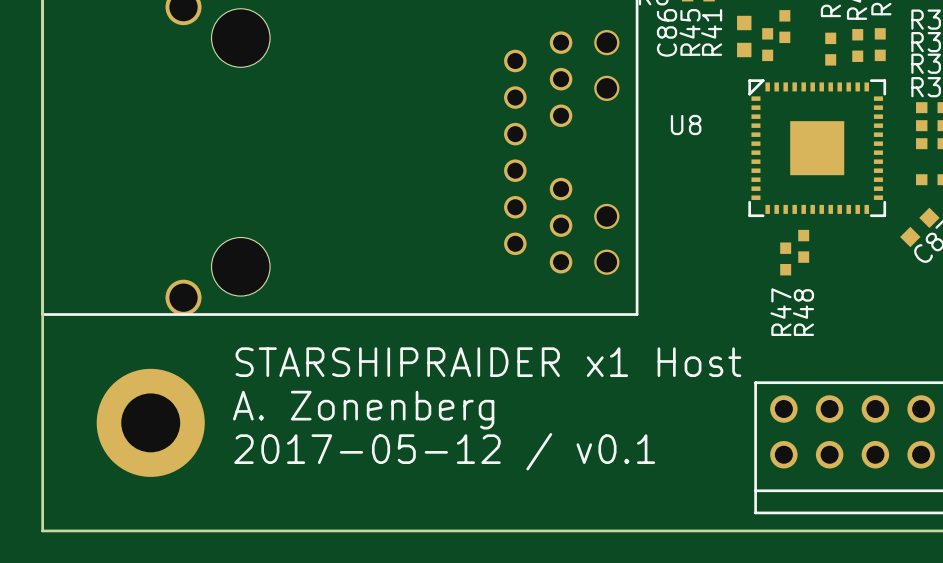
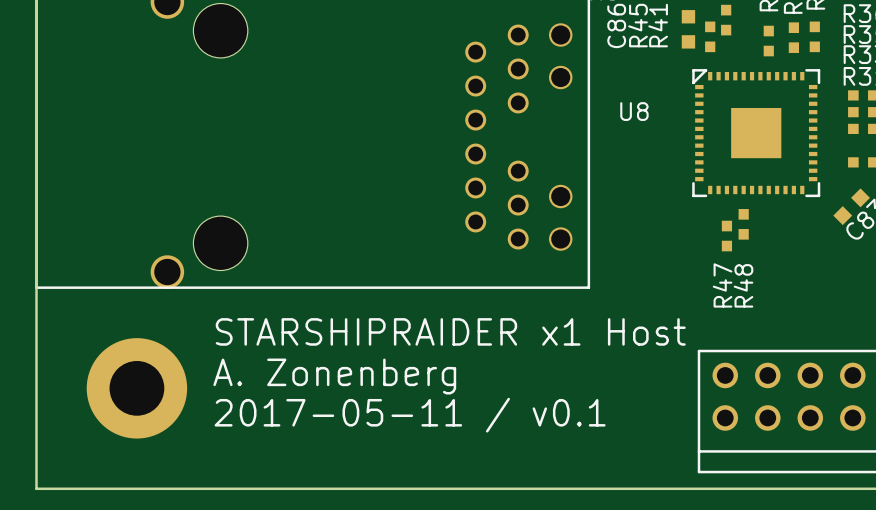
text: 2017-05-12 / v0.1 (444, 451) -> 2017-05-11 / v0.1 (410, 415)

